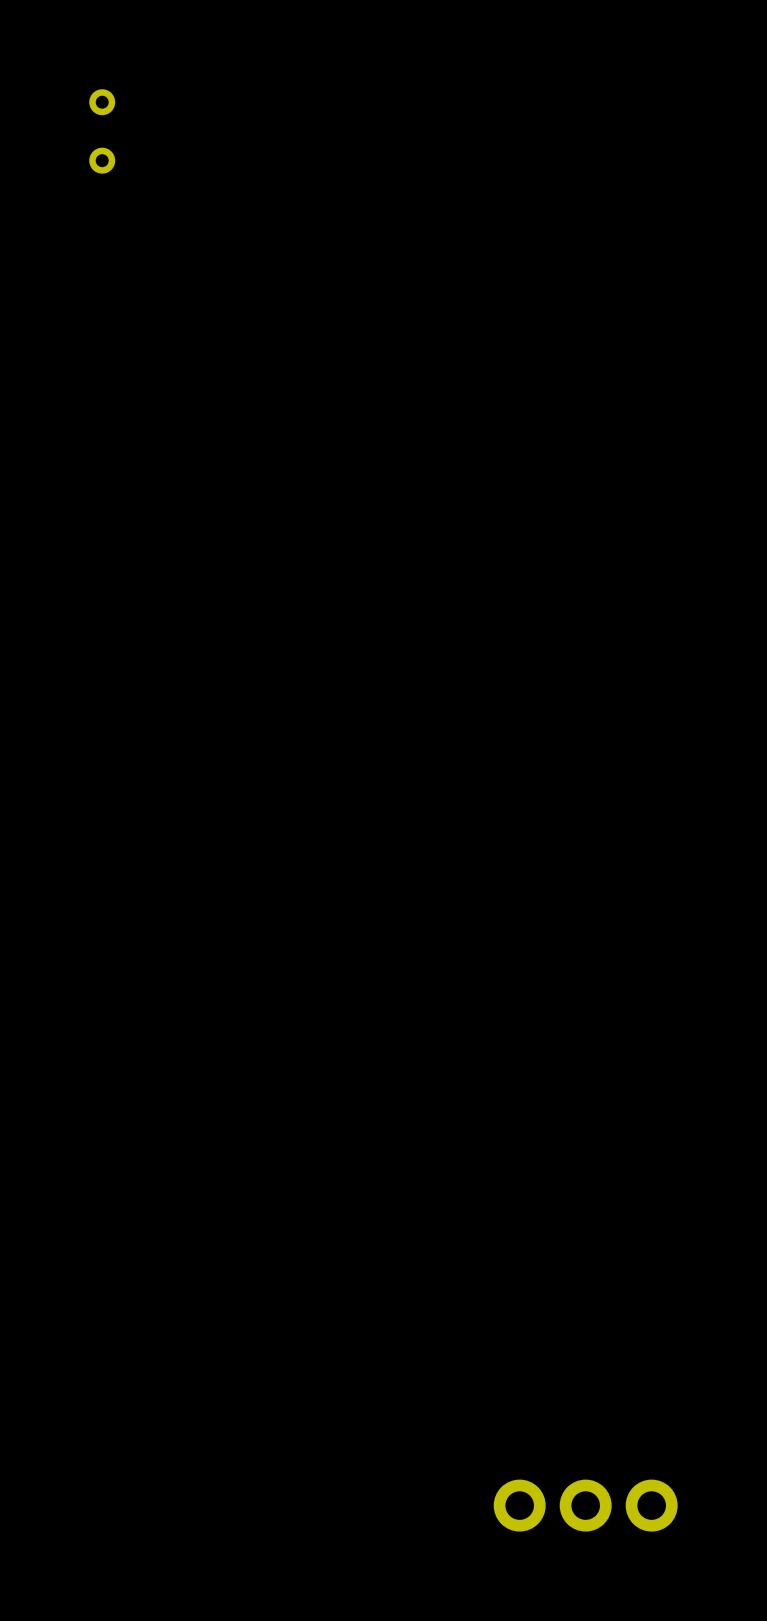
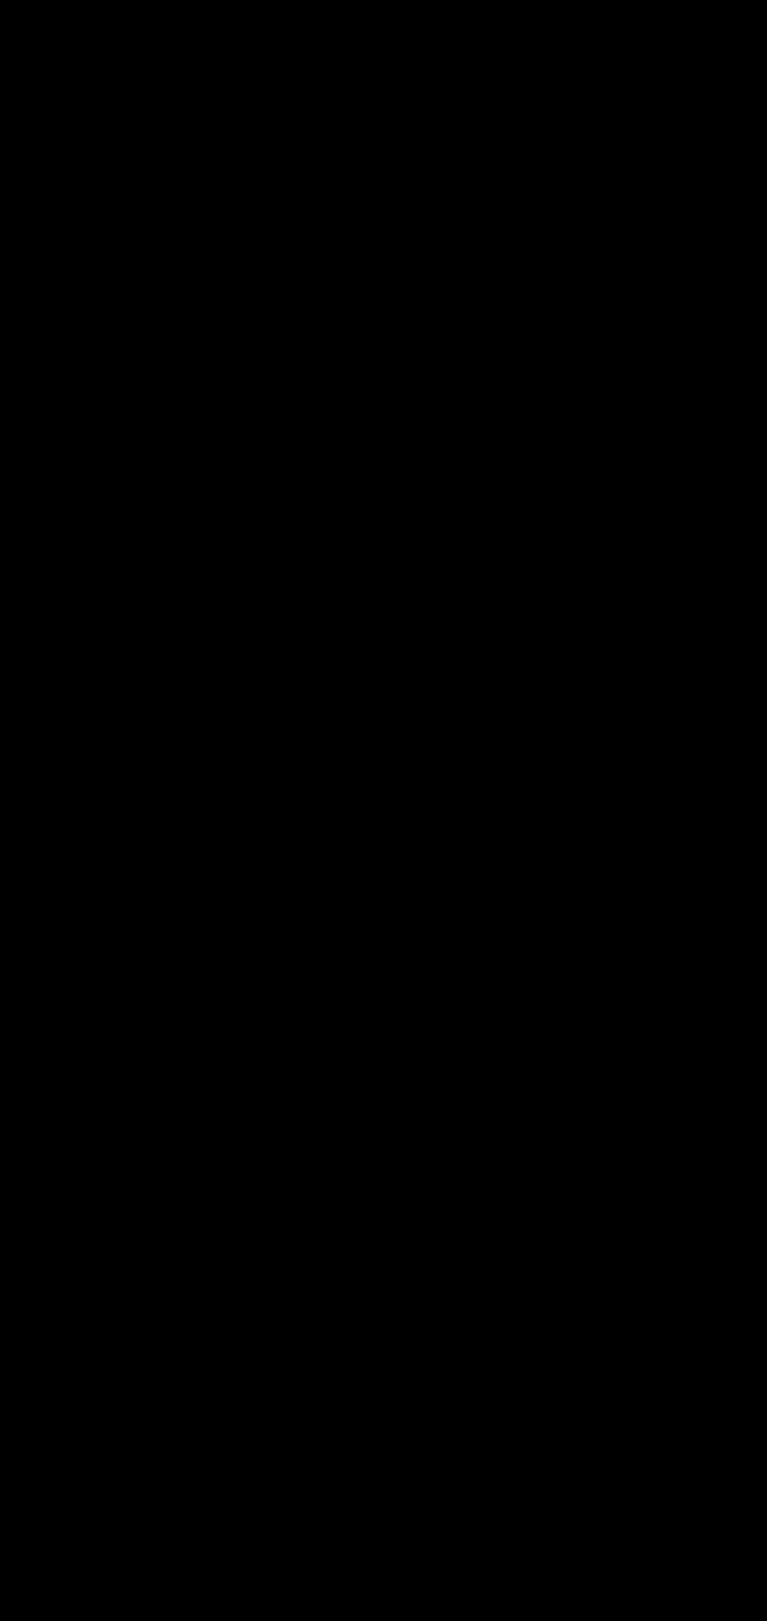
part: (102, 102) -> none
part: (102, 160) -> none
part: (585, 1505) -> none

